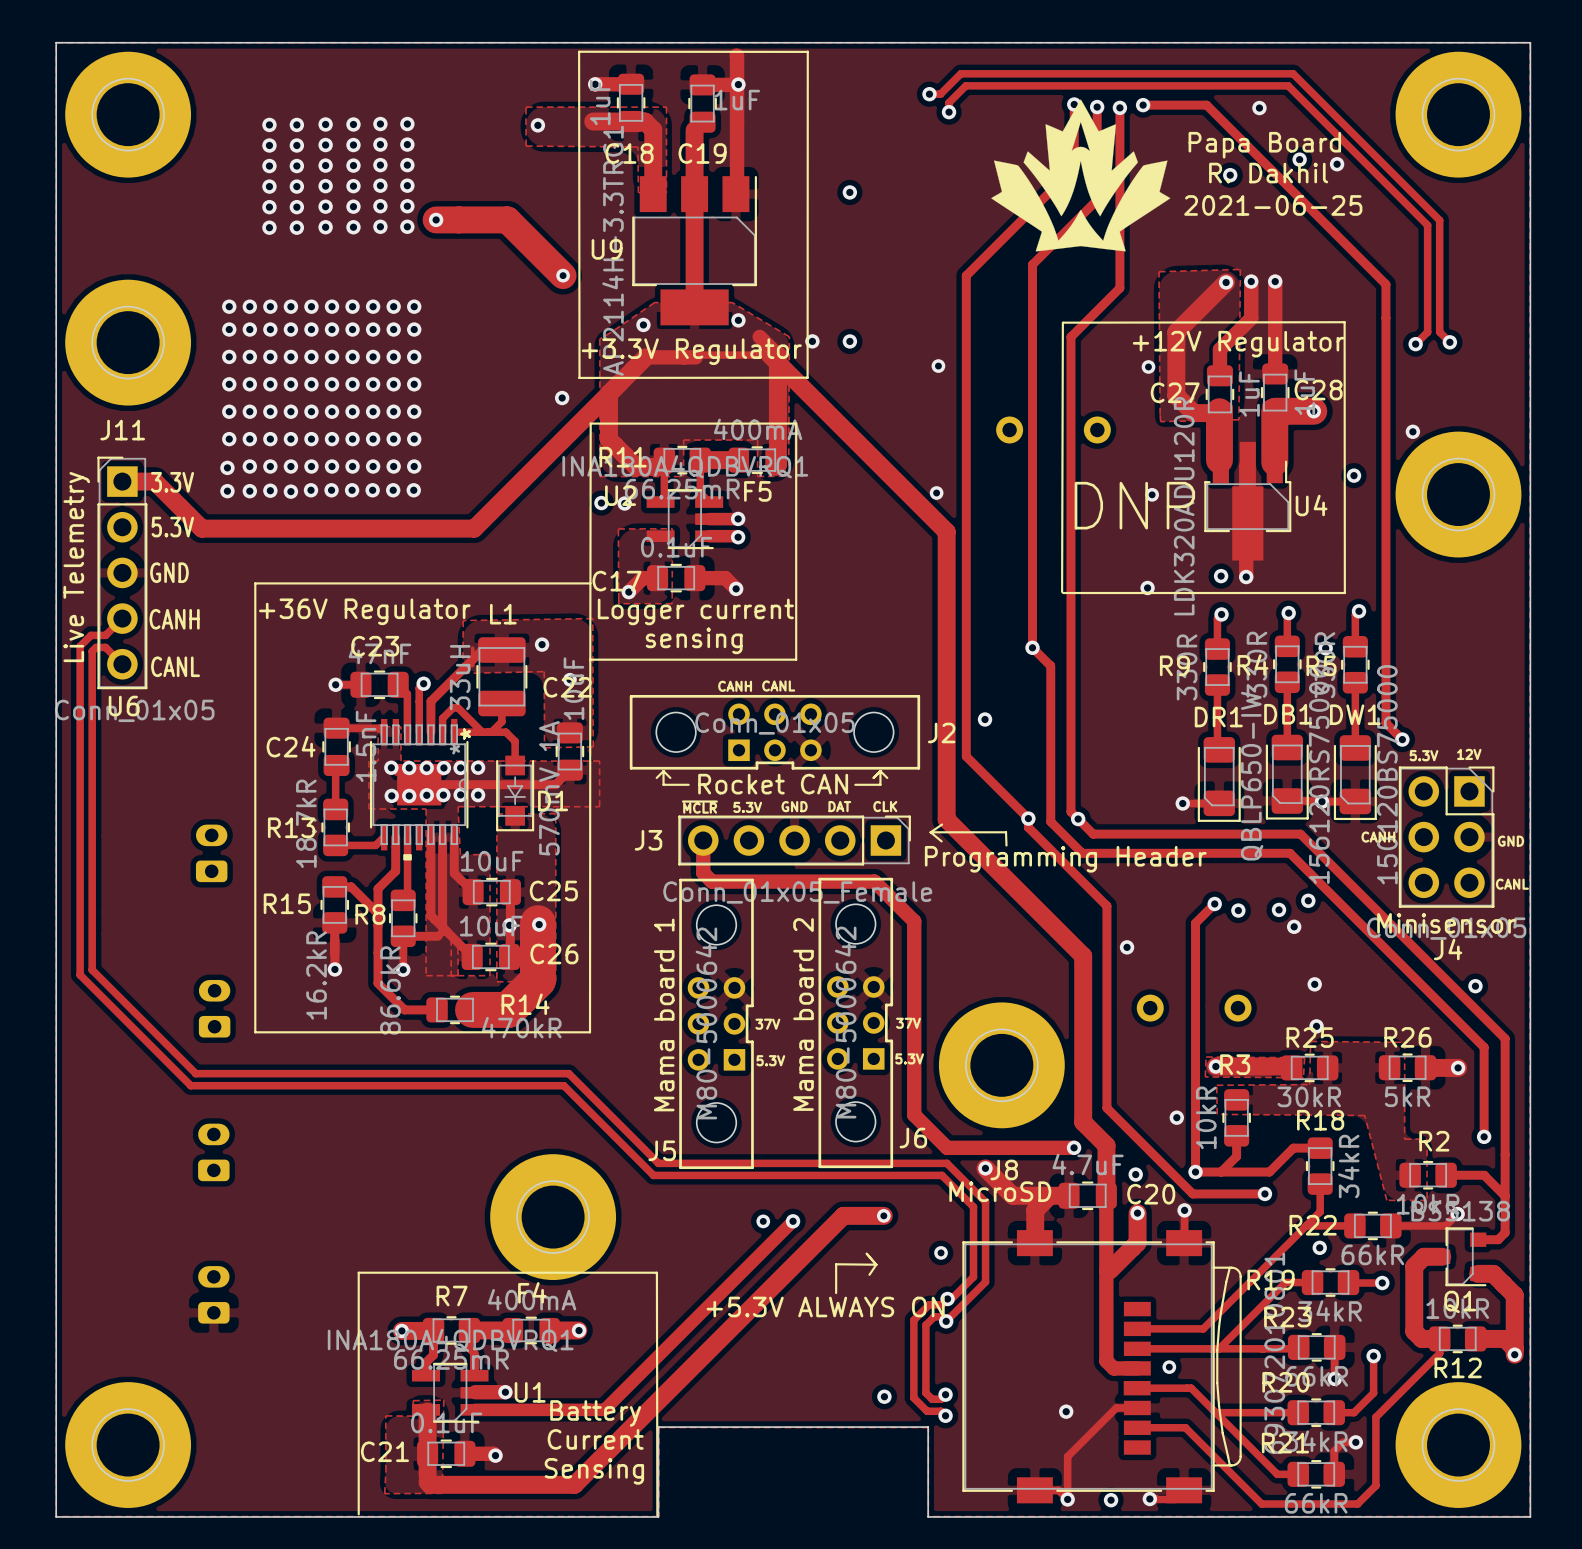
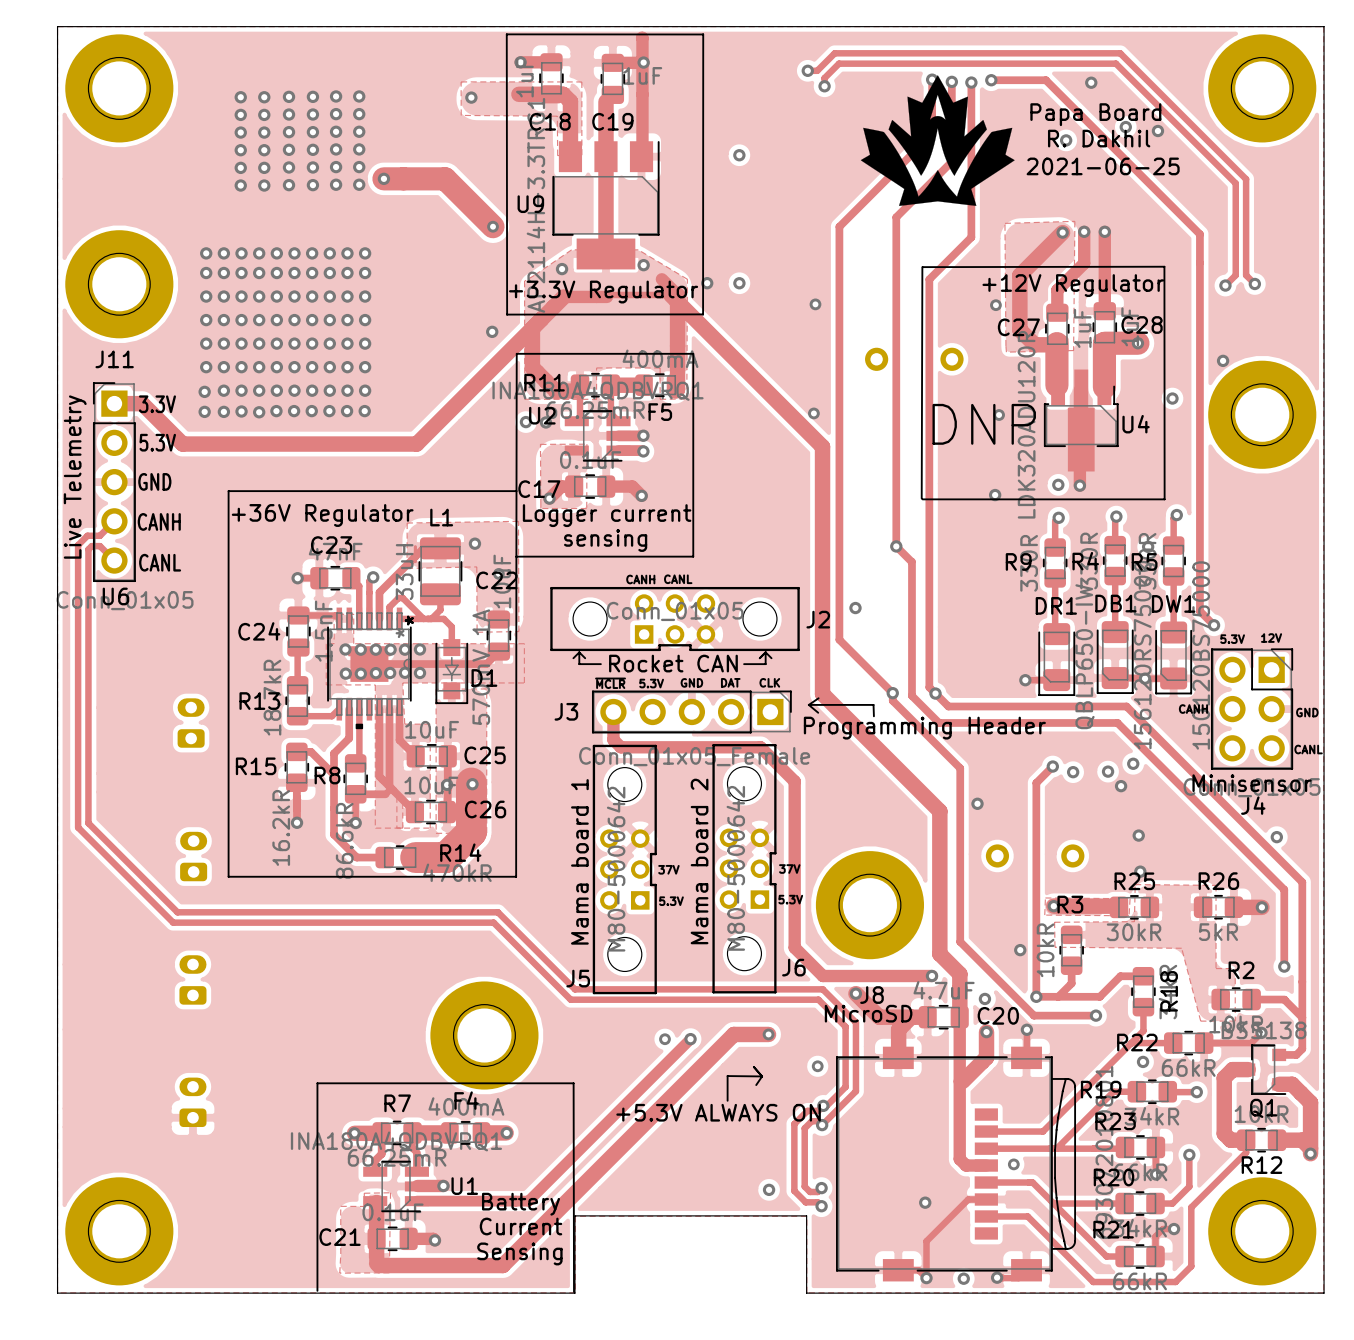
R18 name rotation: 0° (1320, 1120) -> 90° counterclockwise (1169, 991)

